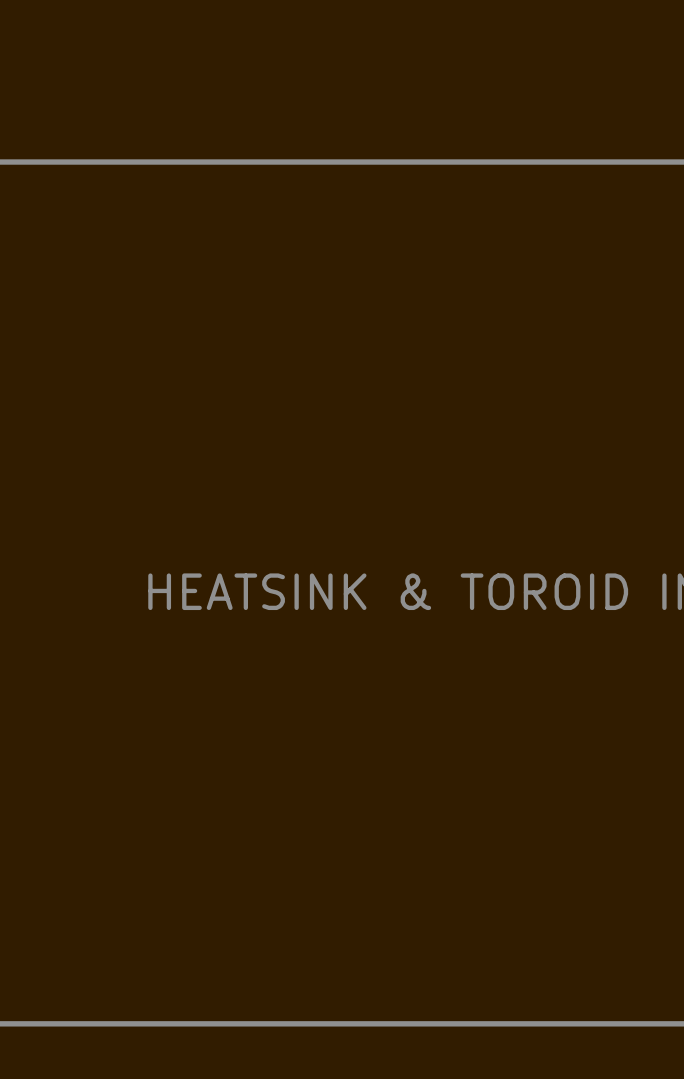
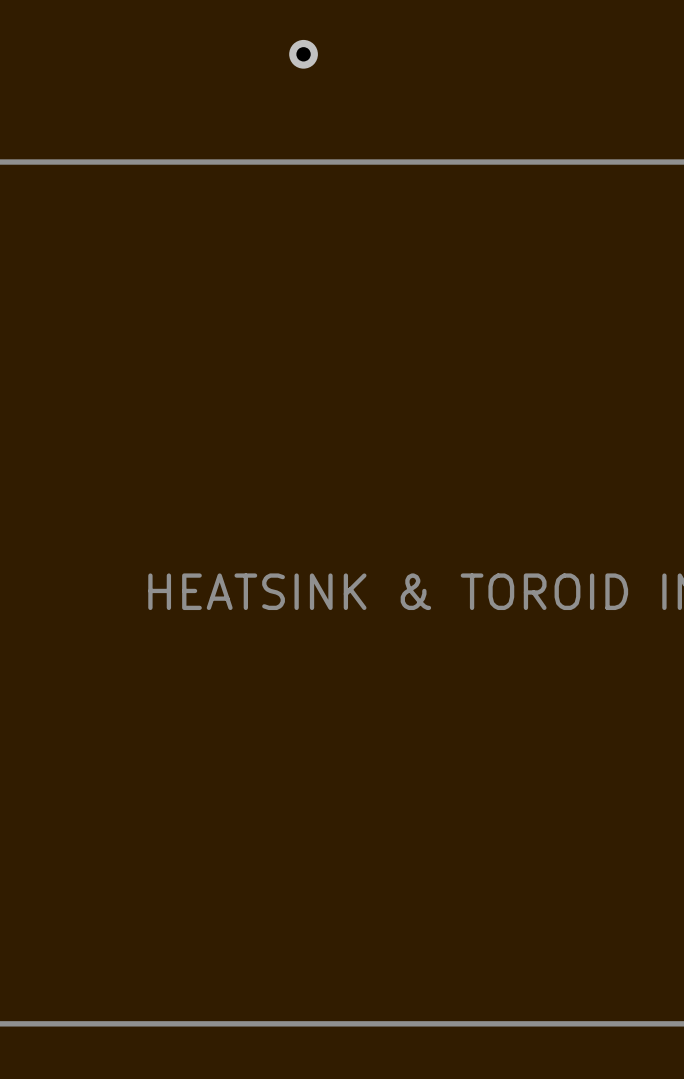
via: none -> (303, 54)

